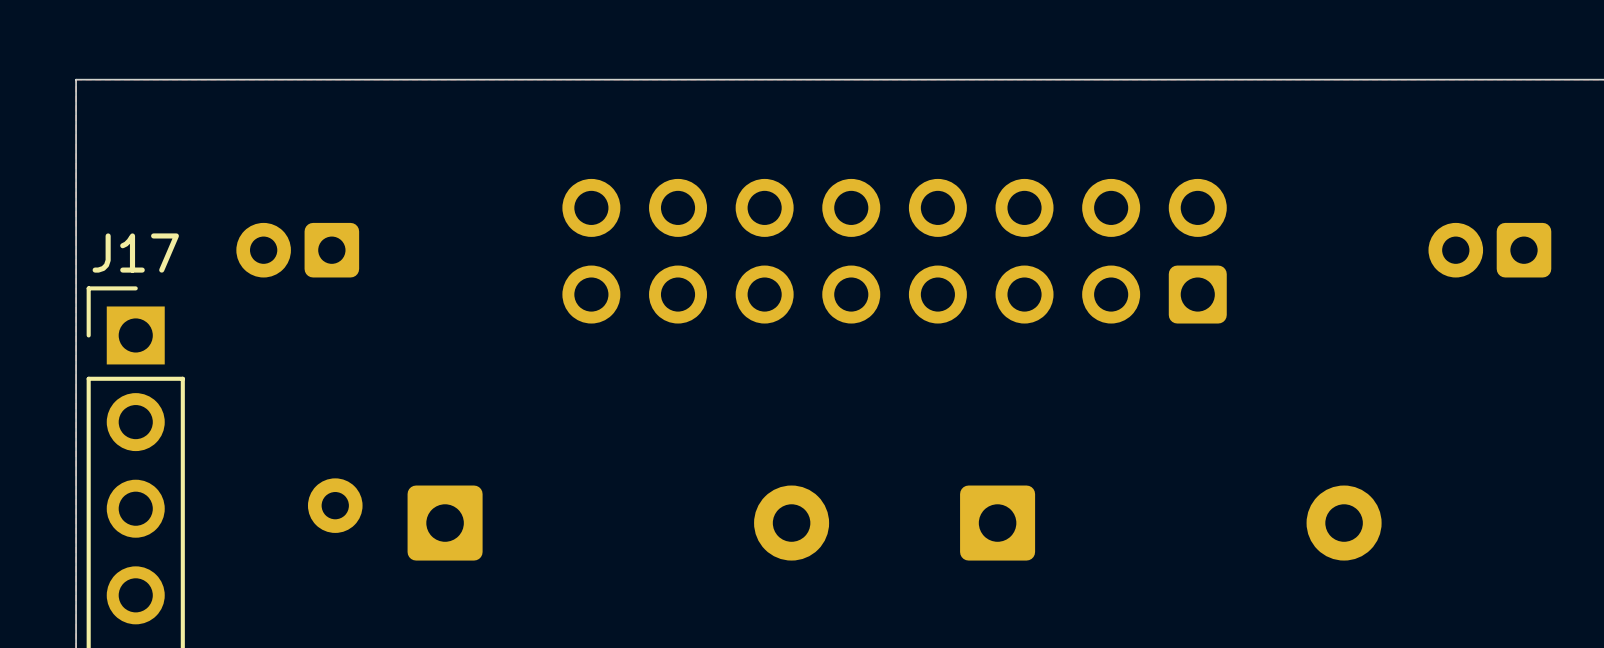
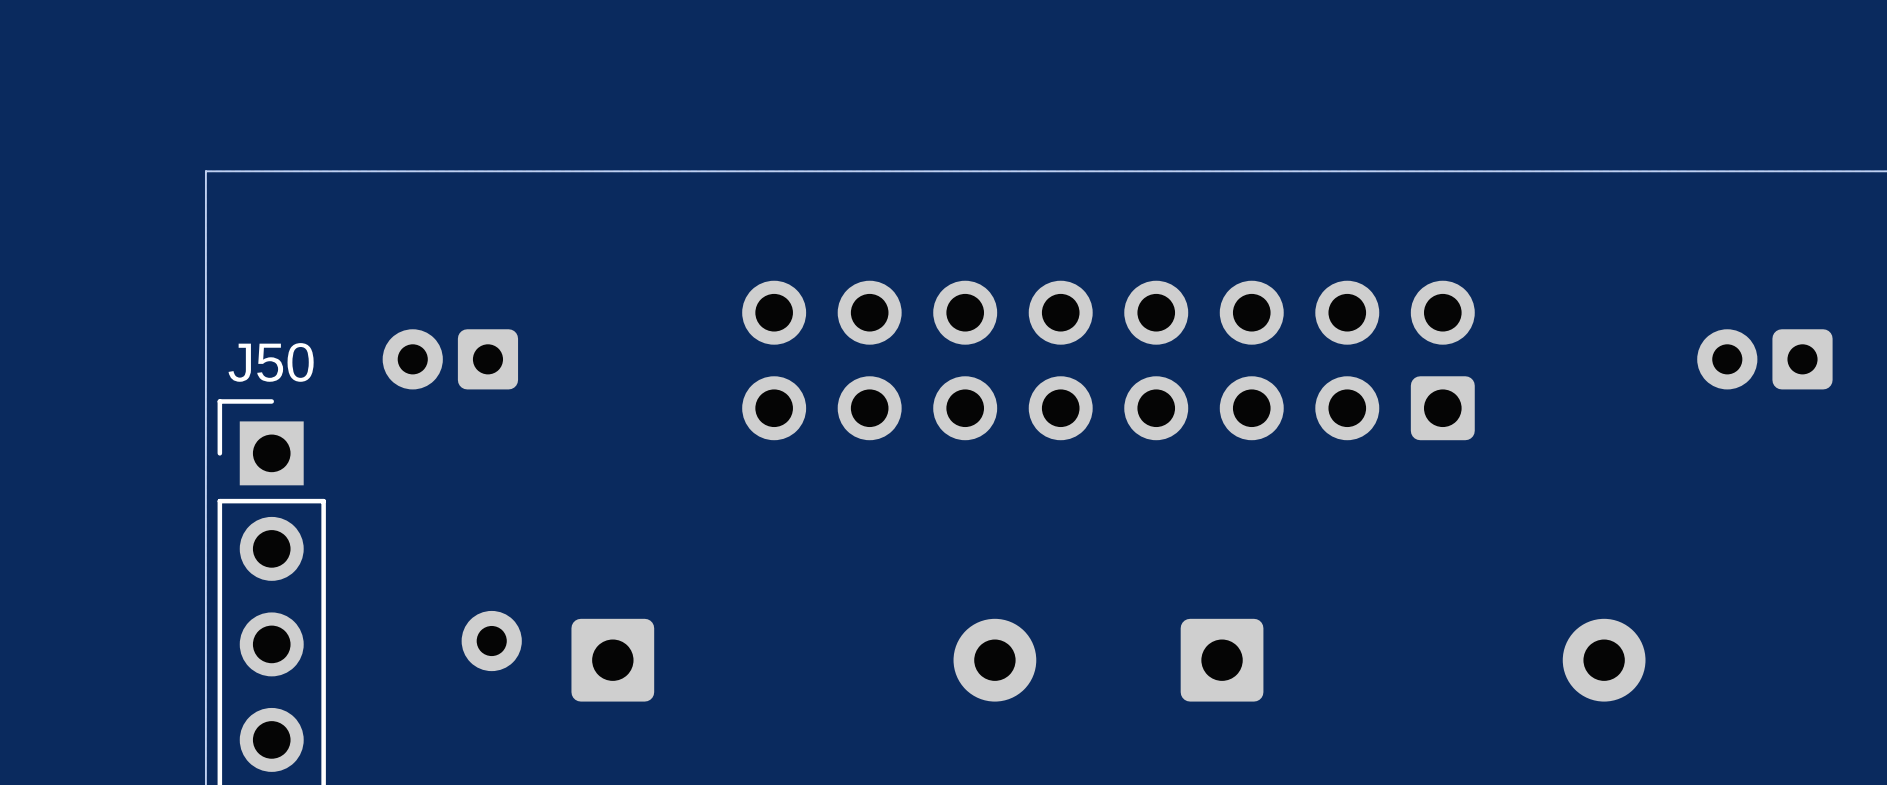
J17 name: J17 (135, 253) -> J50 (271, 362)

